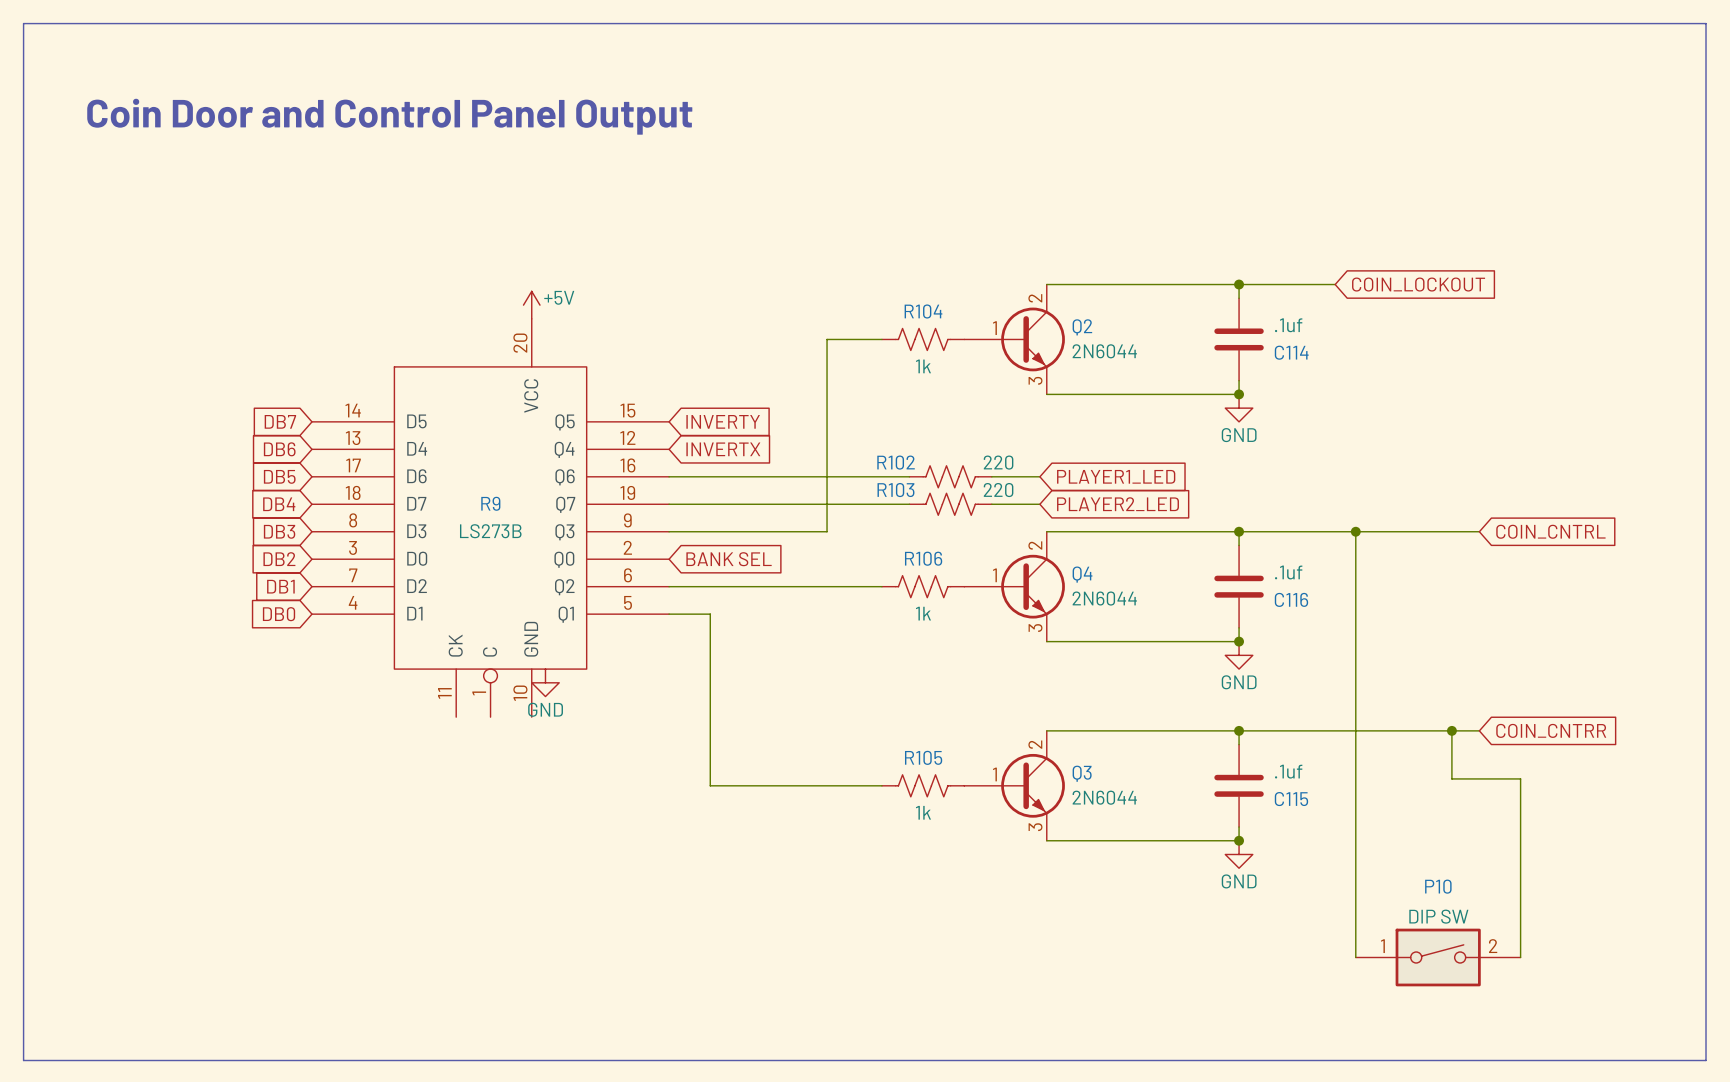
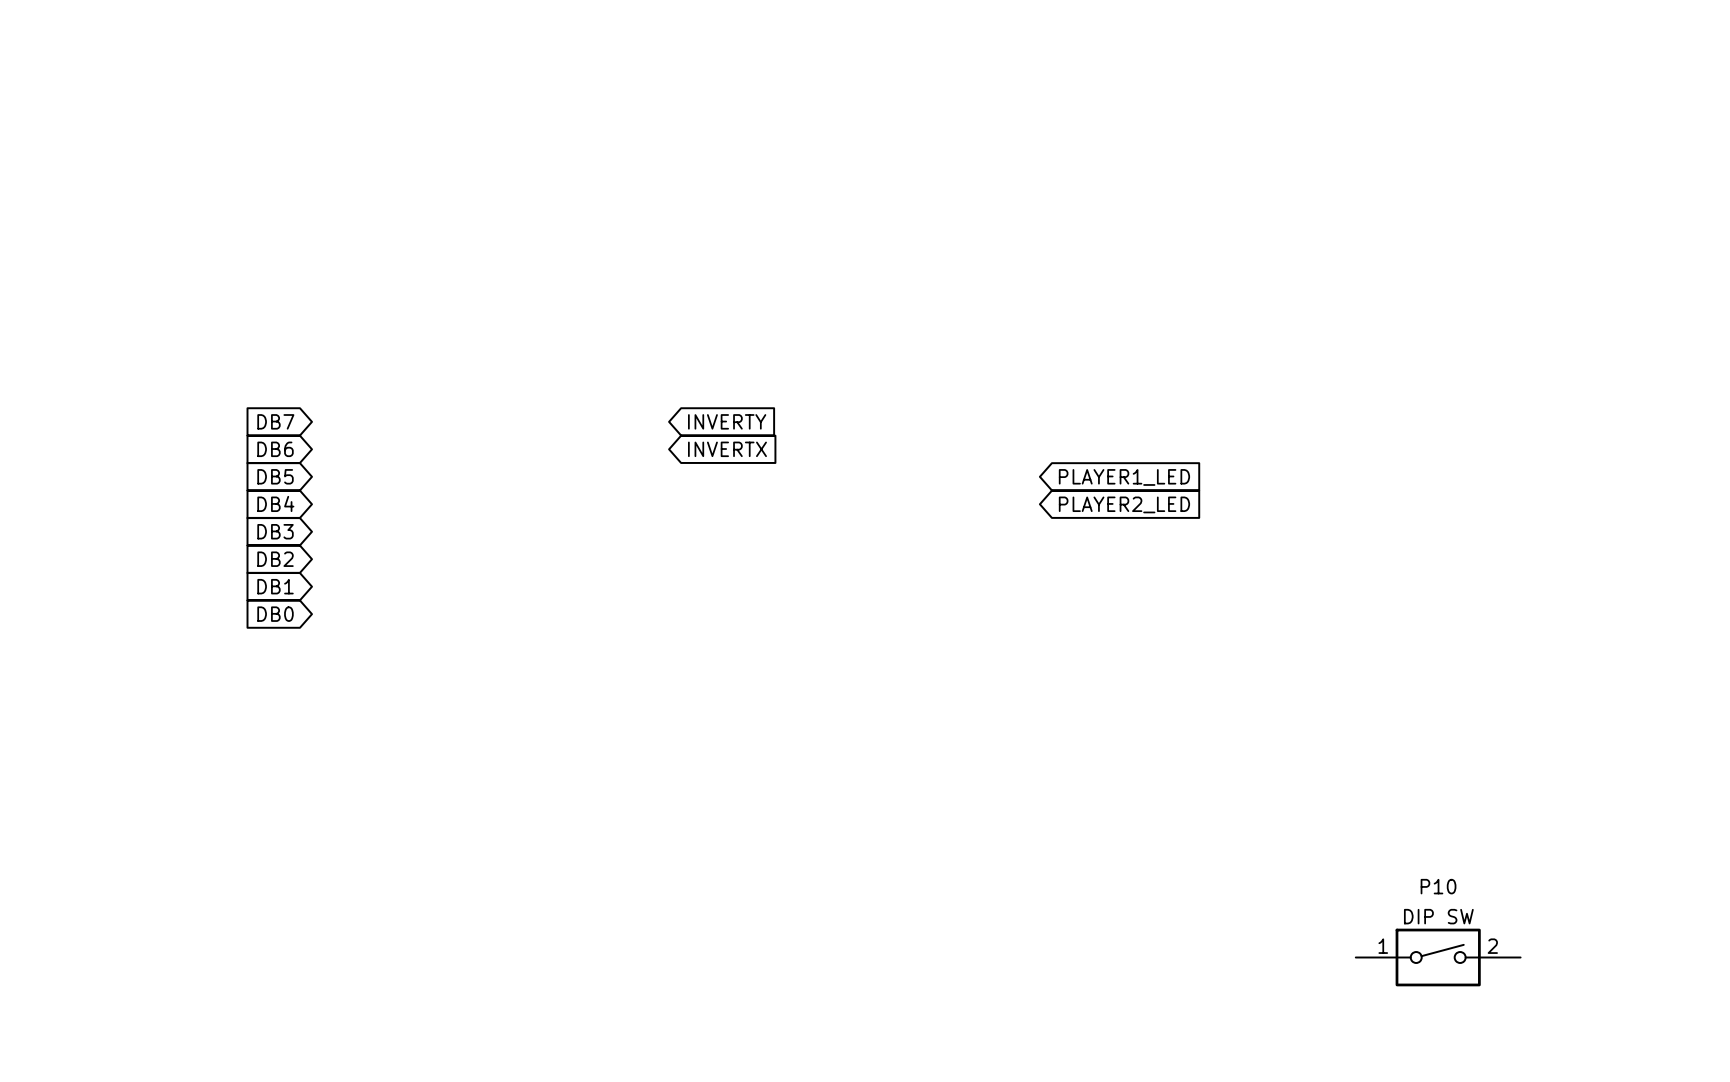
line: (23, 23) (23, 1060) (1706, 1060) (1706, 23) (23, 23) -> none
text: Coin Door and Control Panel Output (389, 116) -> none
wire: (1046, 284) (1335, 284) -> none
wire: (1239, 284) (1239, 298) -> none
junction: (1239, 284) -> none
global label: COIN_LOCKOUT (1418, 284) -> none
power symbol: +5V (531, 305) -> none
wire: (881, 339) (827, 339) (827, 531) (669, 531) -> none
R104: 1k (923, 339) -> none
Q2: 2N6044 (1014, 339) -> none
C114: .1uf (1239, 339) -> none
wire: (1239, 380) (1239, 394) (1046, 394) -> none
junction: (1239, 394) -> none
power symbol: GND (1239, 408) -> none
wire: (669, 476) (909, 476) -> none
R102: 220 (950, 476) -> none
wire: (991, 476) (1039, 476) -> none
wire: (669, 504) (909, 504) -> none
R103: 220 (950, 504) -> none
wire: (991, 504) (1039, 504) -> none
R9: LS273B (490, 518) -> none
wire: (1046, 531) (1479, 531) -> none
wire: (1239, 531) (1239, 545) -> none
junction: (1239, 531) -> none
wire: (1355, 531) (1355, 957) -> none
junction: (1355, 531) -> none
global label: COIN_CNTRL (1550, 531) -> none
global label: BANK SEL (729, 559) -> none
wire: (669, 586) (881, 586) -> none
R106: 1k (923, 586) -> none
Q4: 2N6044 (1014, 586) -> none
C116: .1uf (1239, 586) -> none
wire: (669, 614) (710, 614) (710, 785) (881, 785) -> none
wire: (1239, 627) (1239, 641) (1046, 641) -> none
junction: (1239, 641) -> none
power symbol: GND (1239, 655) -> none
power symbol: GND (545, 682) -> none
wire: (1046, 730) (1479, 730) -> none
wire: (1239, 730) (1239, 744) -> none
junction: (1239, 730) -> none
wire: (1451, 730) (1451, 778) (1520, 778) (1520, 957) -> none
junction: (1451, 730) -> none
global label: COIN_CNTRR (1551, 730) -> none
R105: 1k (923, 785) -> none
Q3: 2N6044 (1014, 785) -> none
C115: .1uf (1239, 785) -> none
wire: (1239, 827) (1239, 840) (1046, 840) -> none
junction: (1239, 840) -> none
power symbol: GND (1239, 854) -> none

